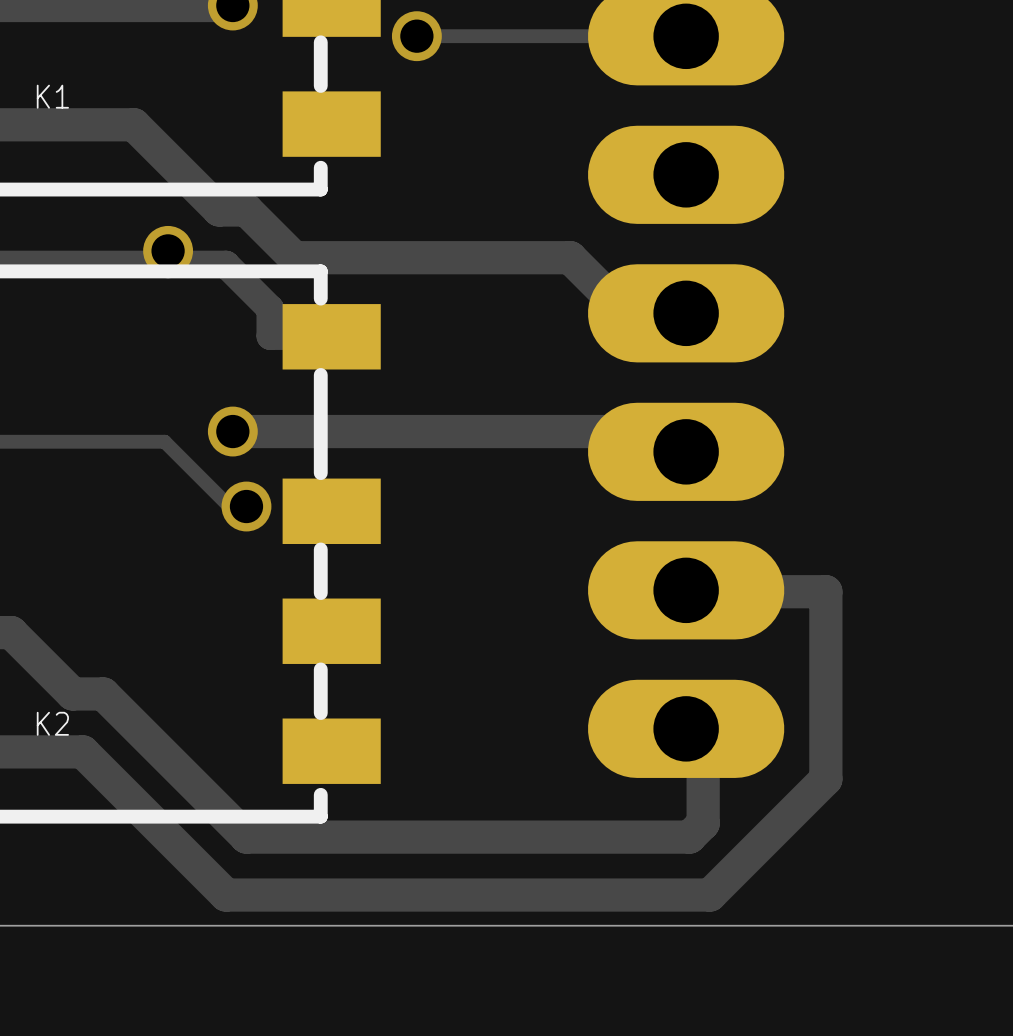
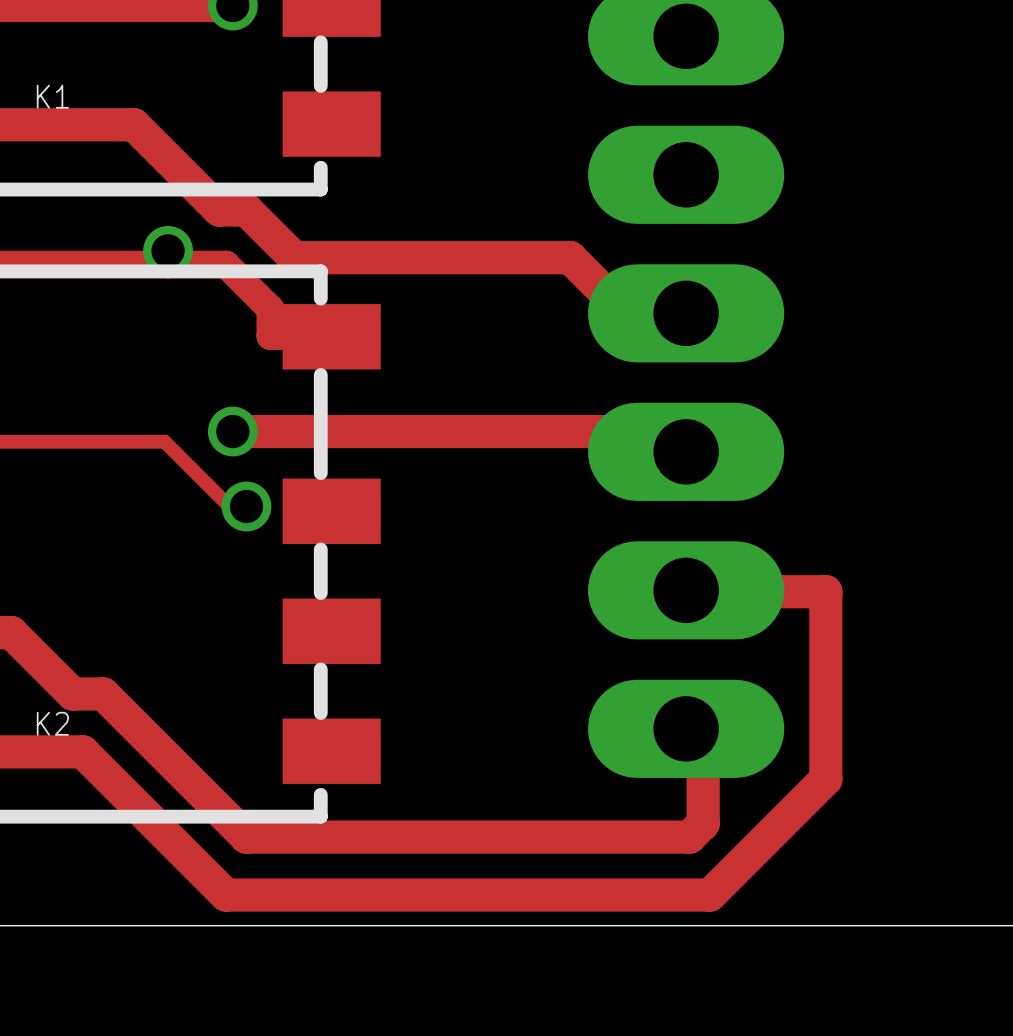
track: (416, 36) (686, 36) -> none
via: (416, 36) -> none

